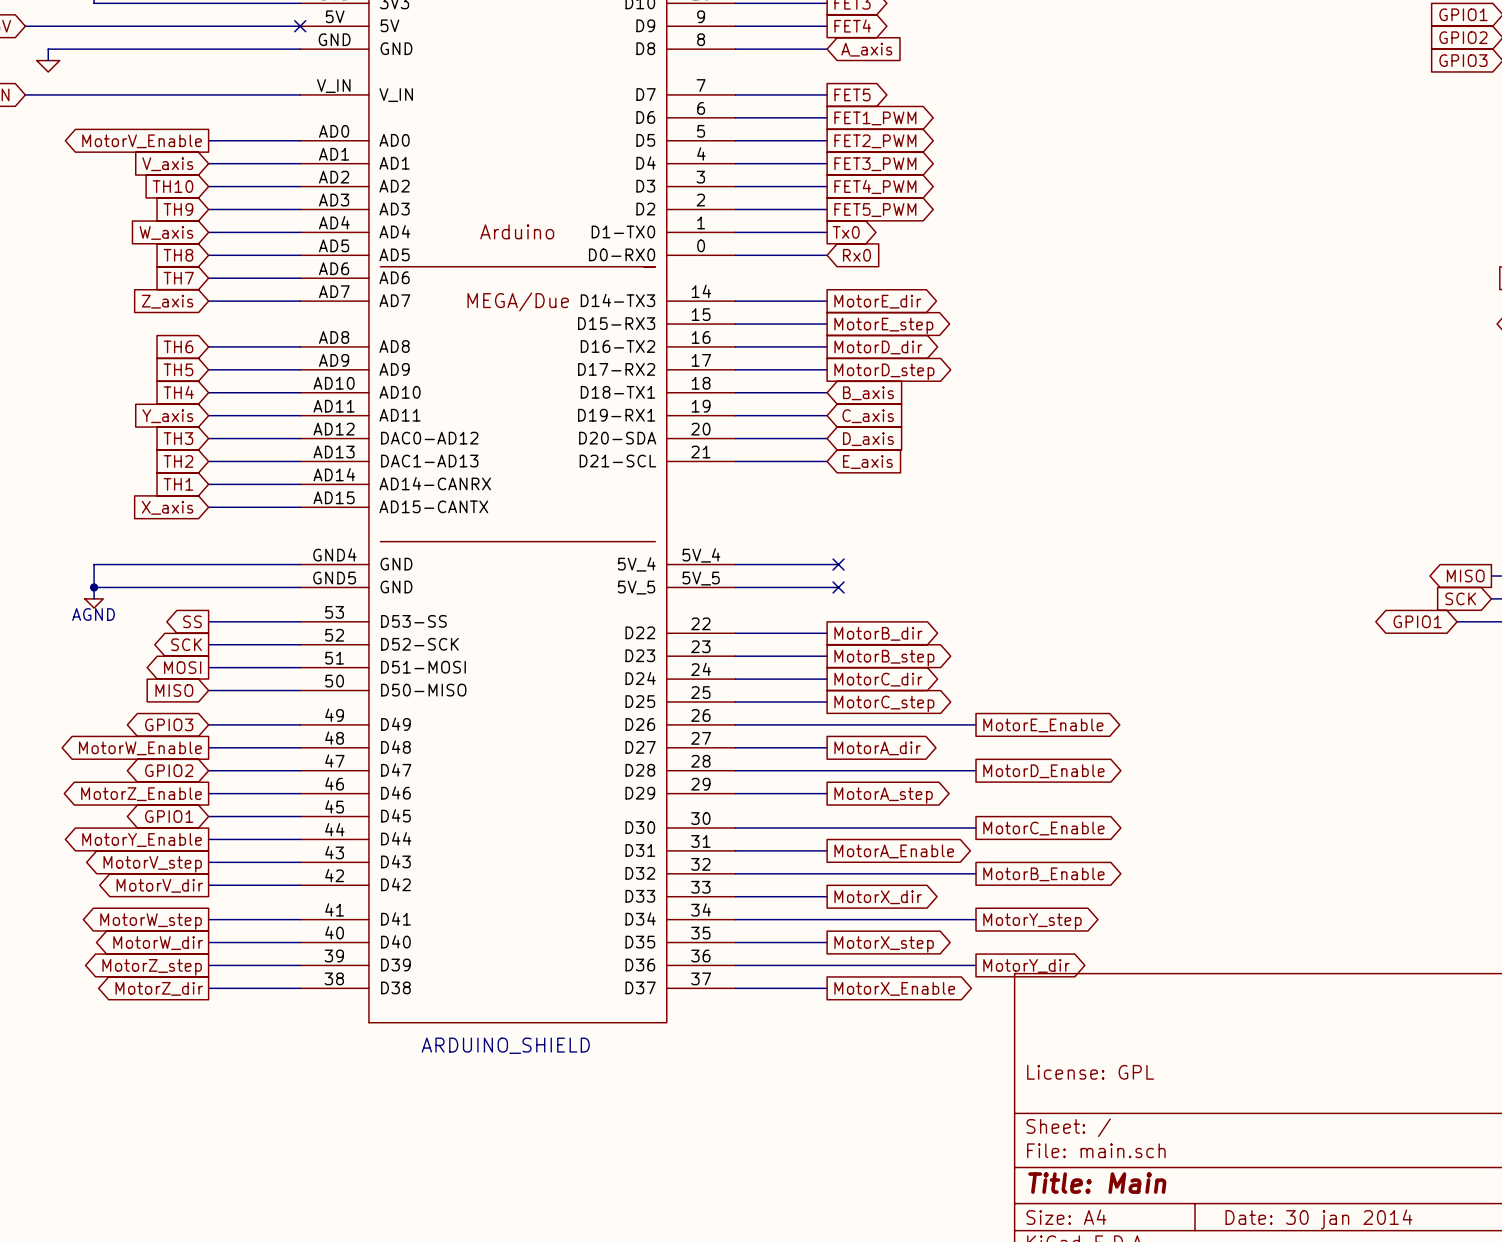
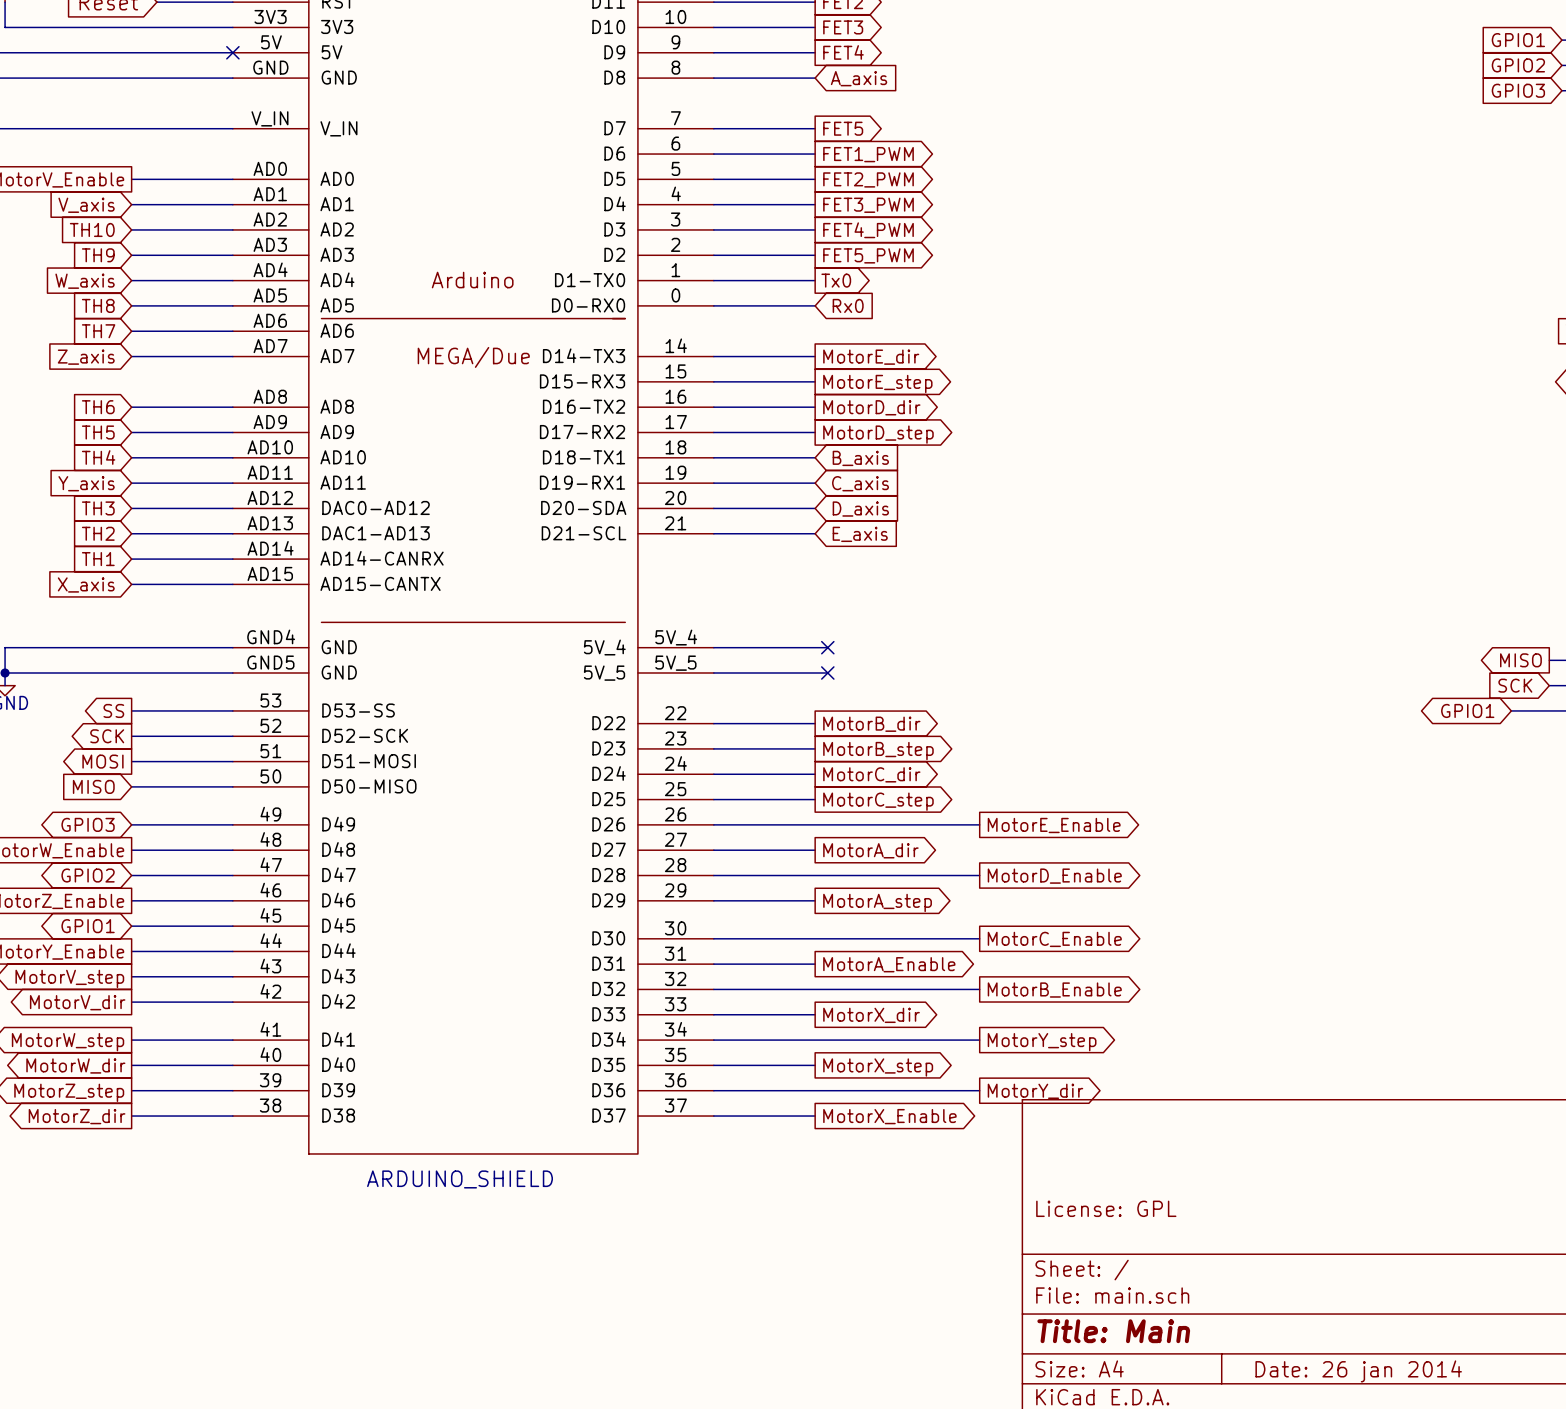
title block: Date: 30 jan 2014 (1318, 1219) -> Date: 26 jan 2014 (1358, 1371)

